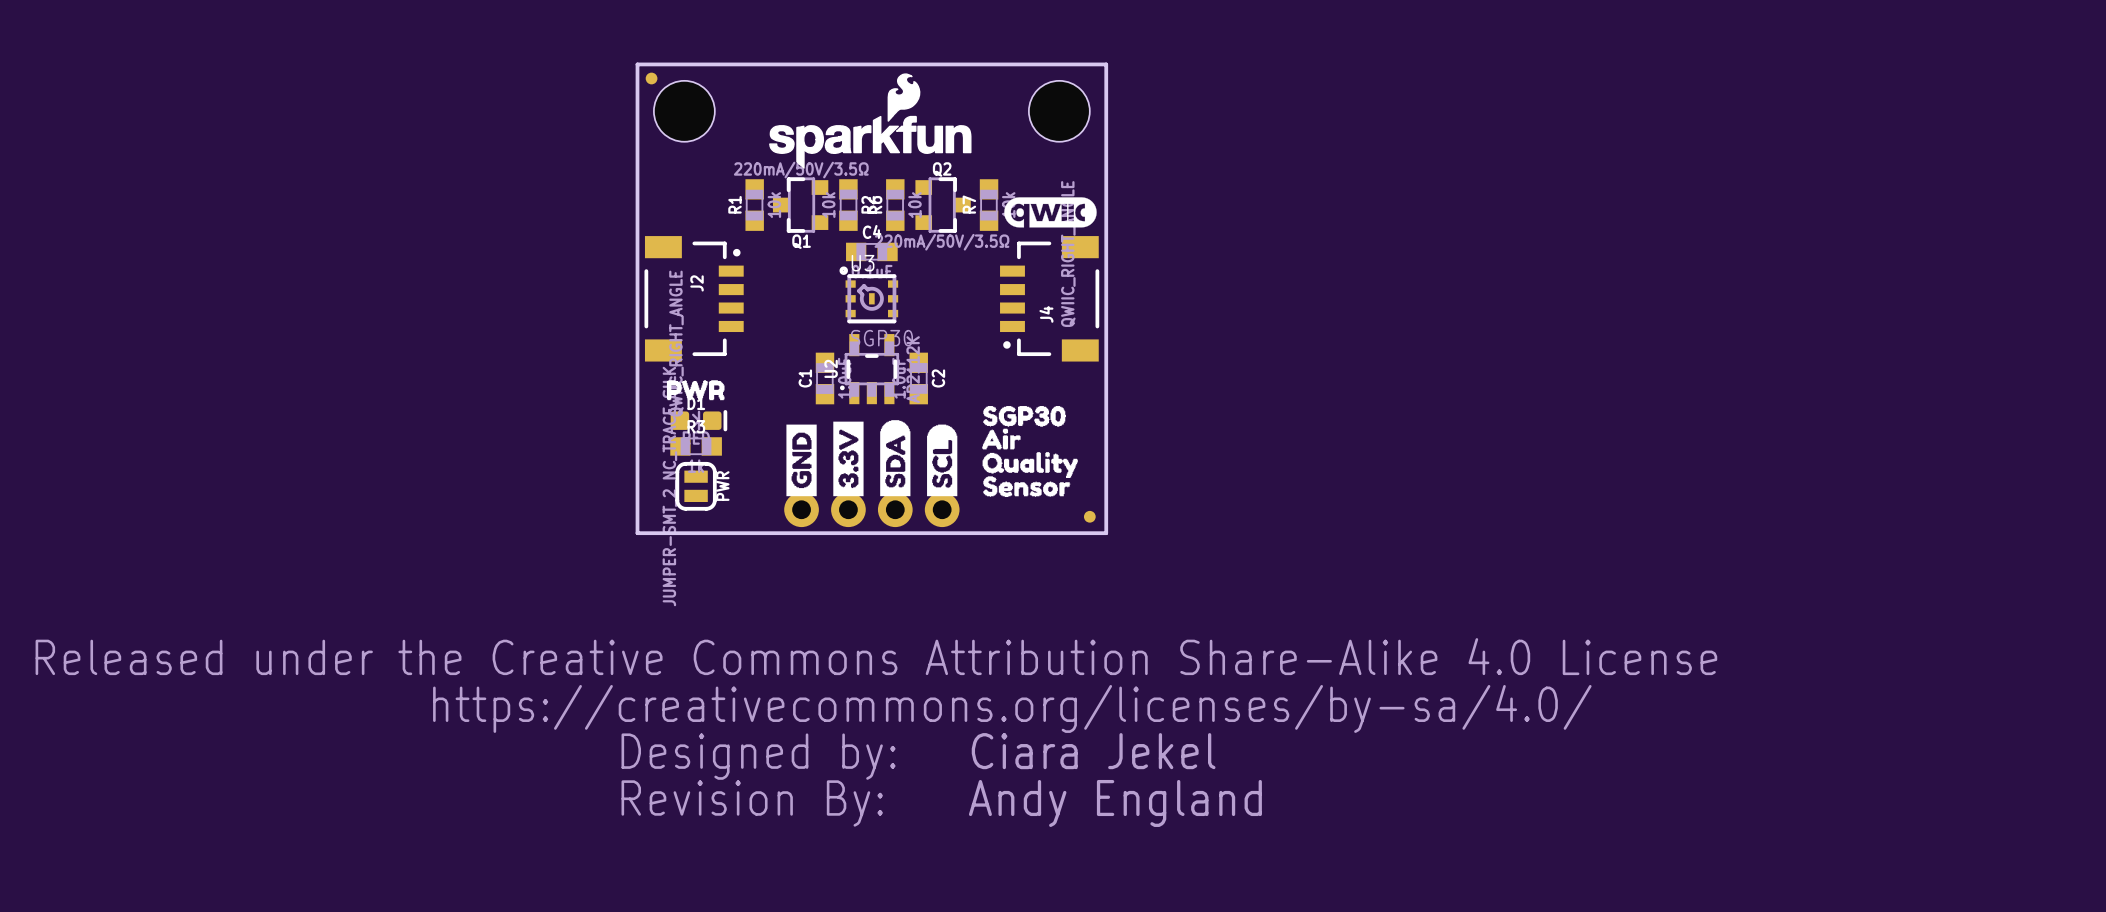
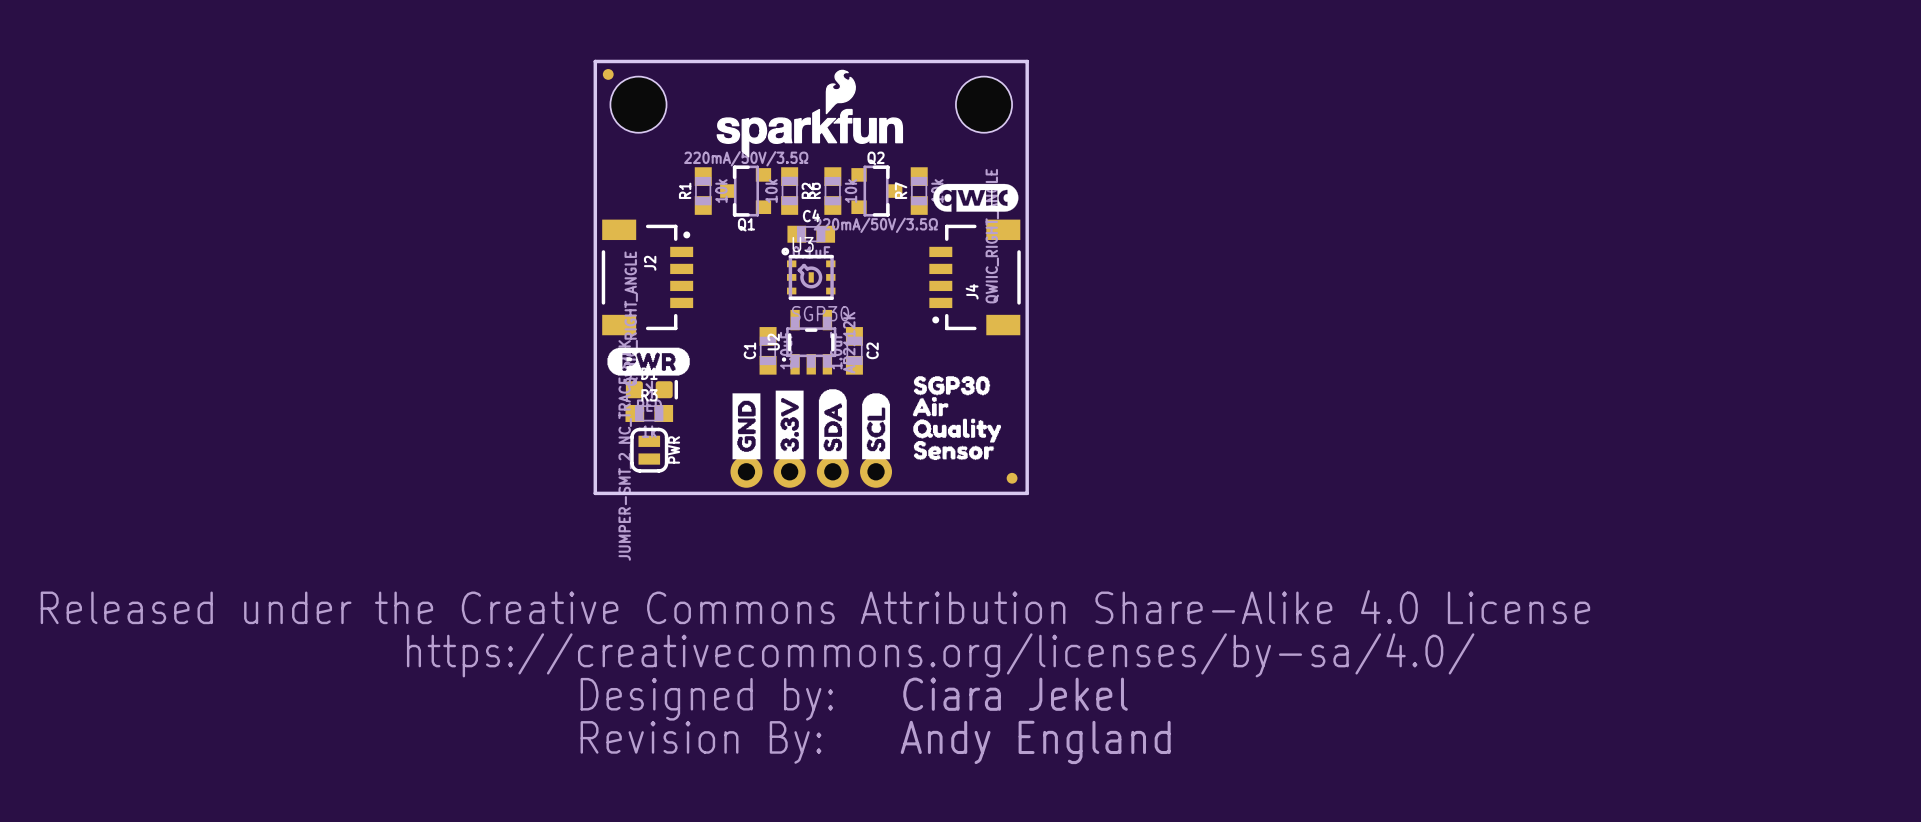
drawing shape: [666, 380, 725, 401] -> [607, 347, 690, 376]

